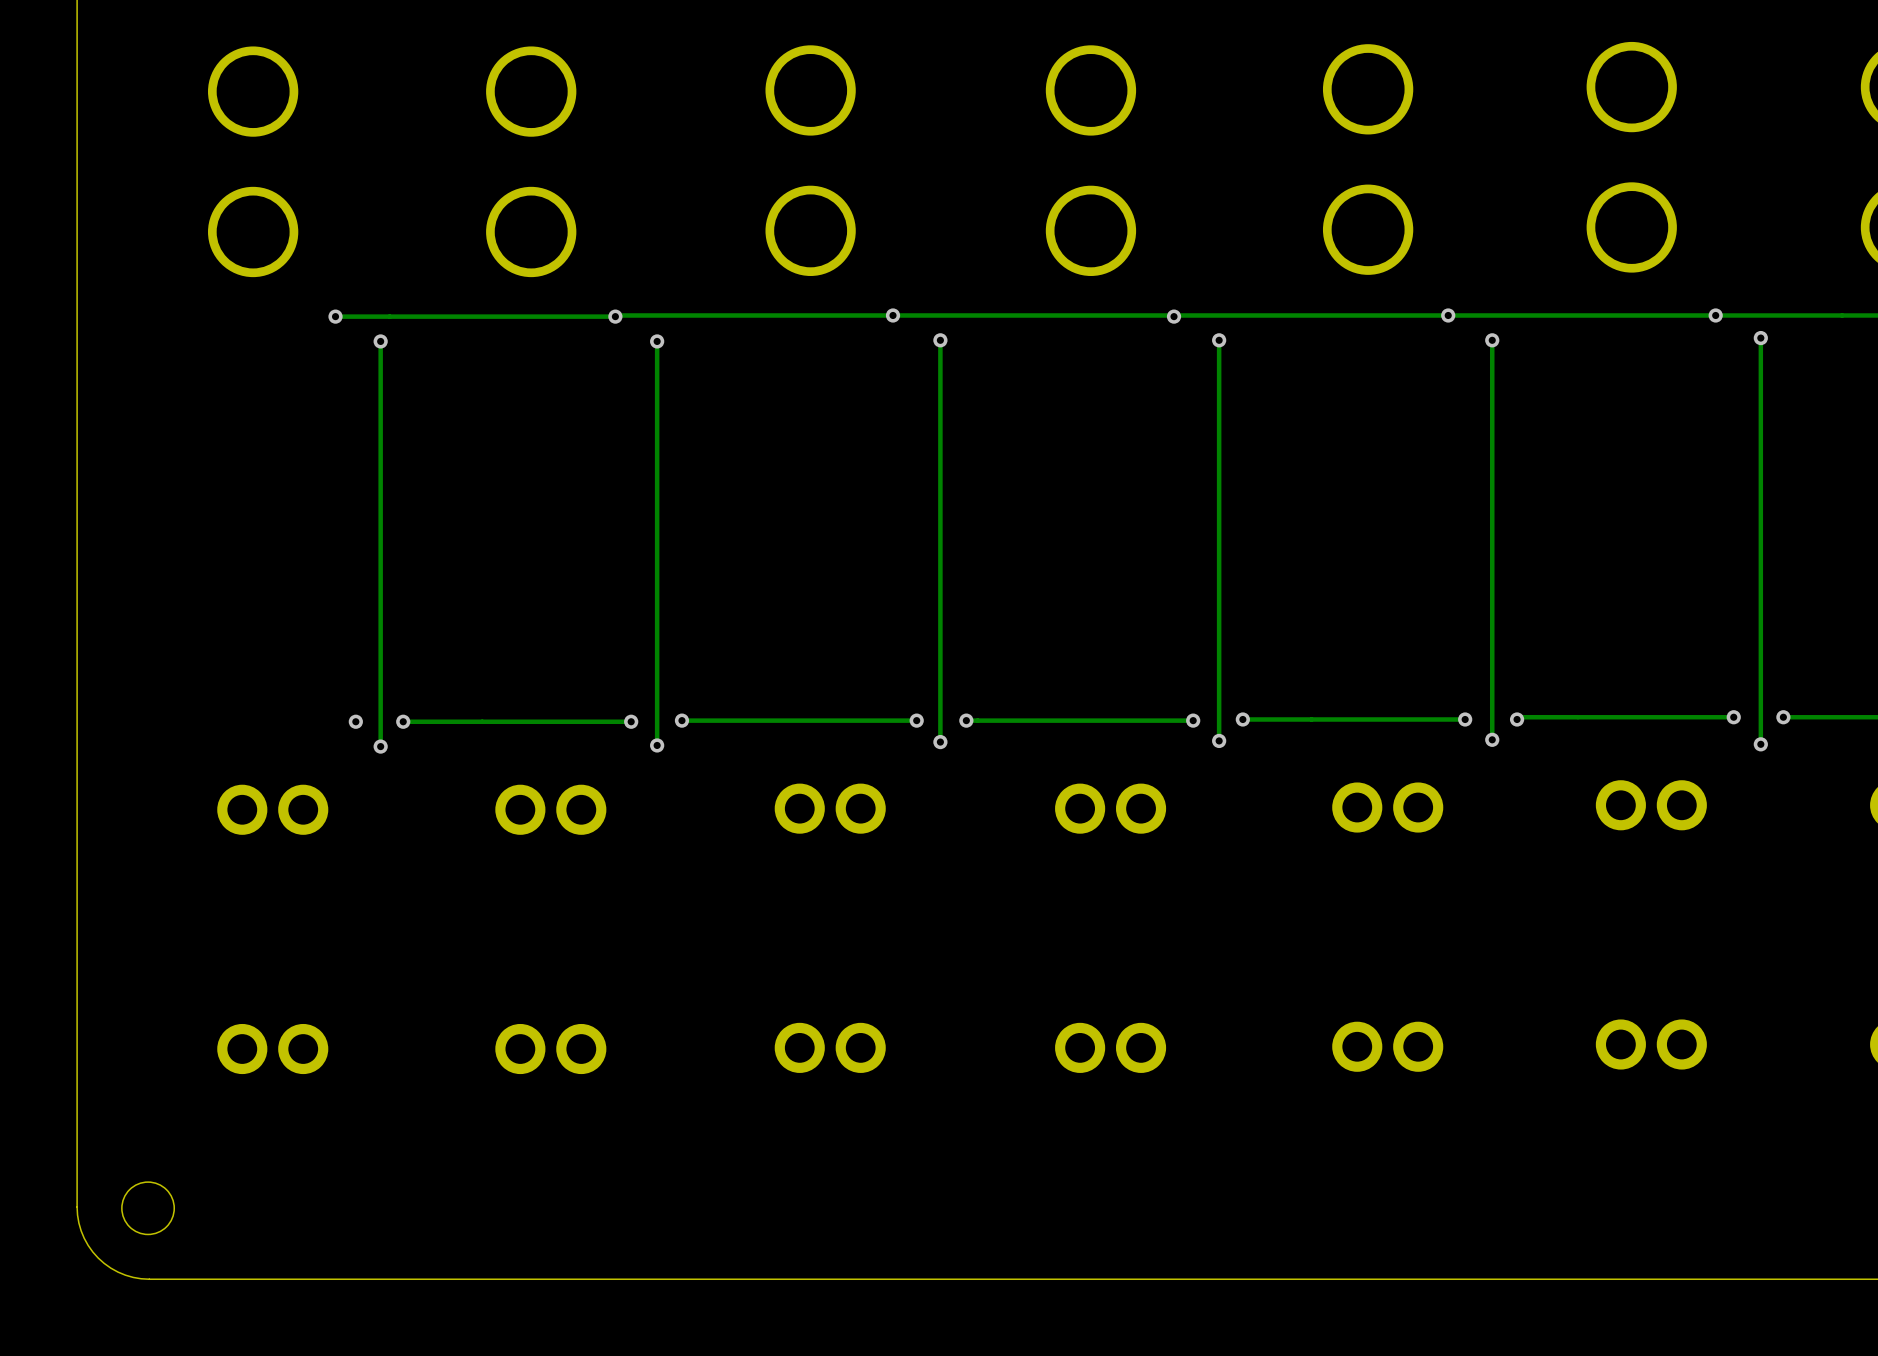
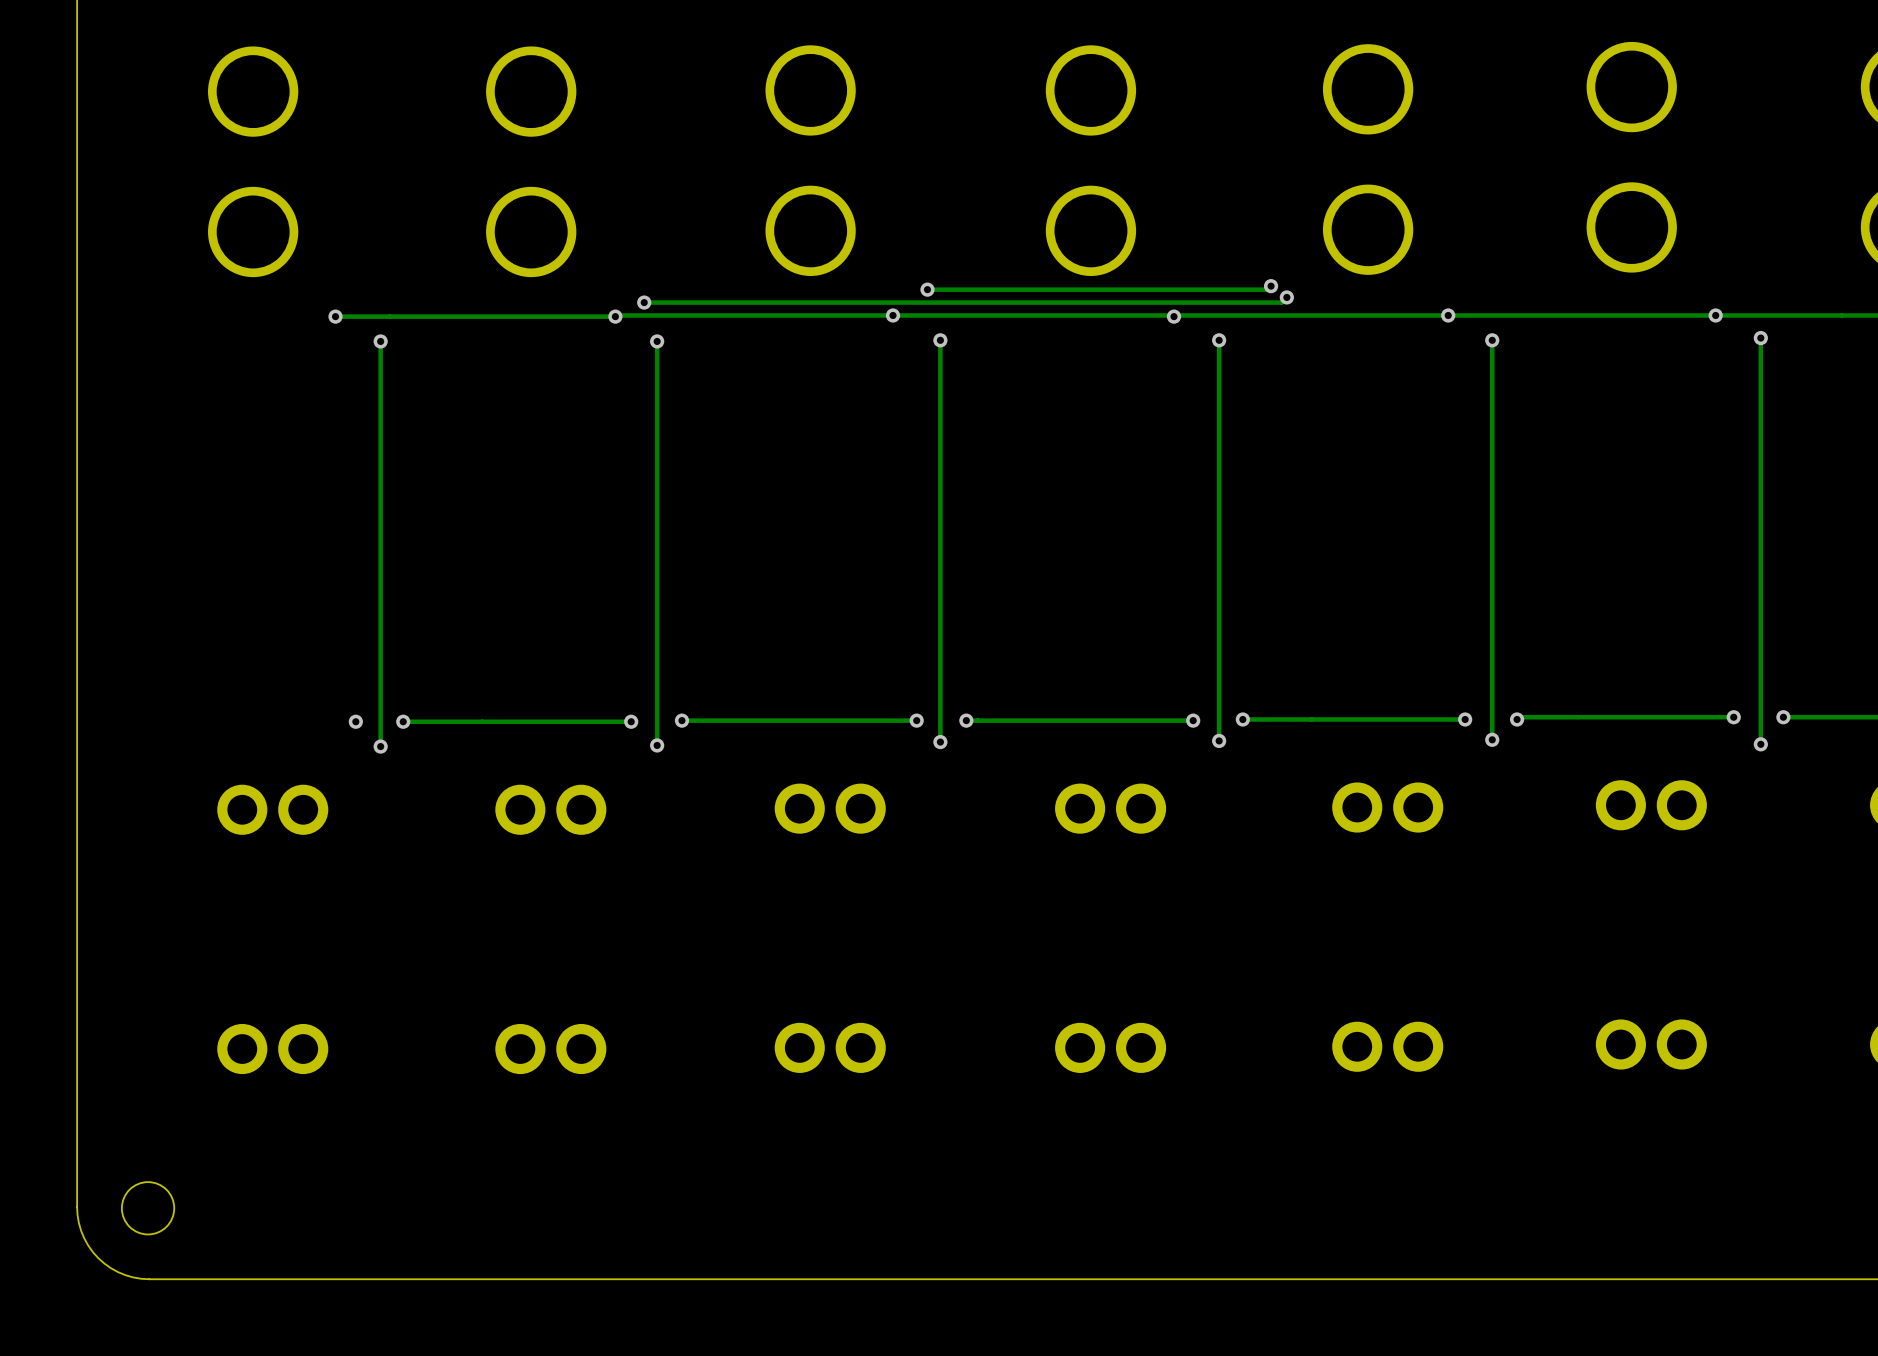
track: none -> (1271, 286) (1267, 289) (927, 289)
via: none -> (1271, 286)
via: none -> (927, 289)
track: none -> (1286, 297) (1281, 302) (644, 302)
via: none -> (1286, 297)
via: none -> (644, 302)

